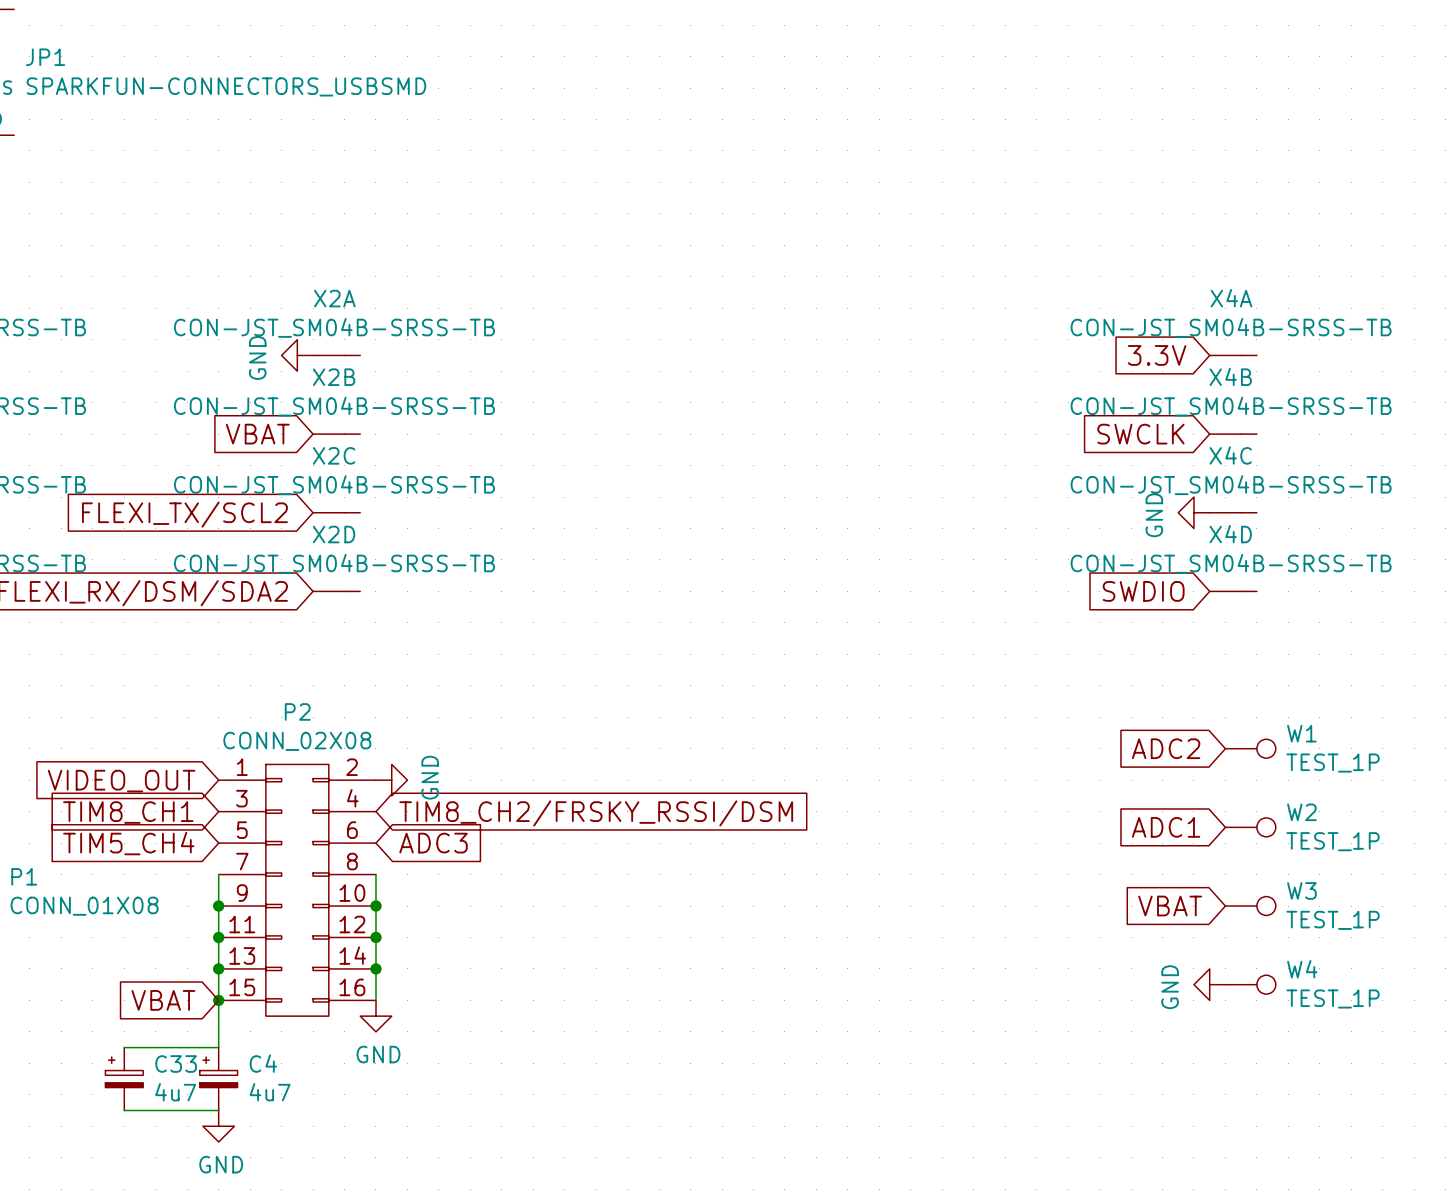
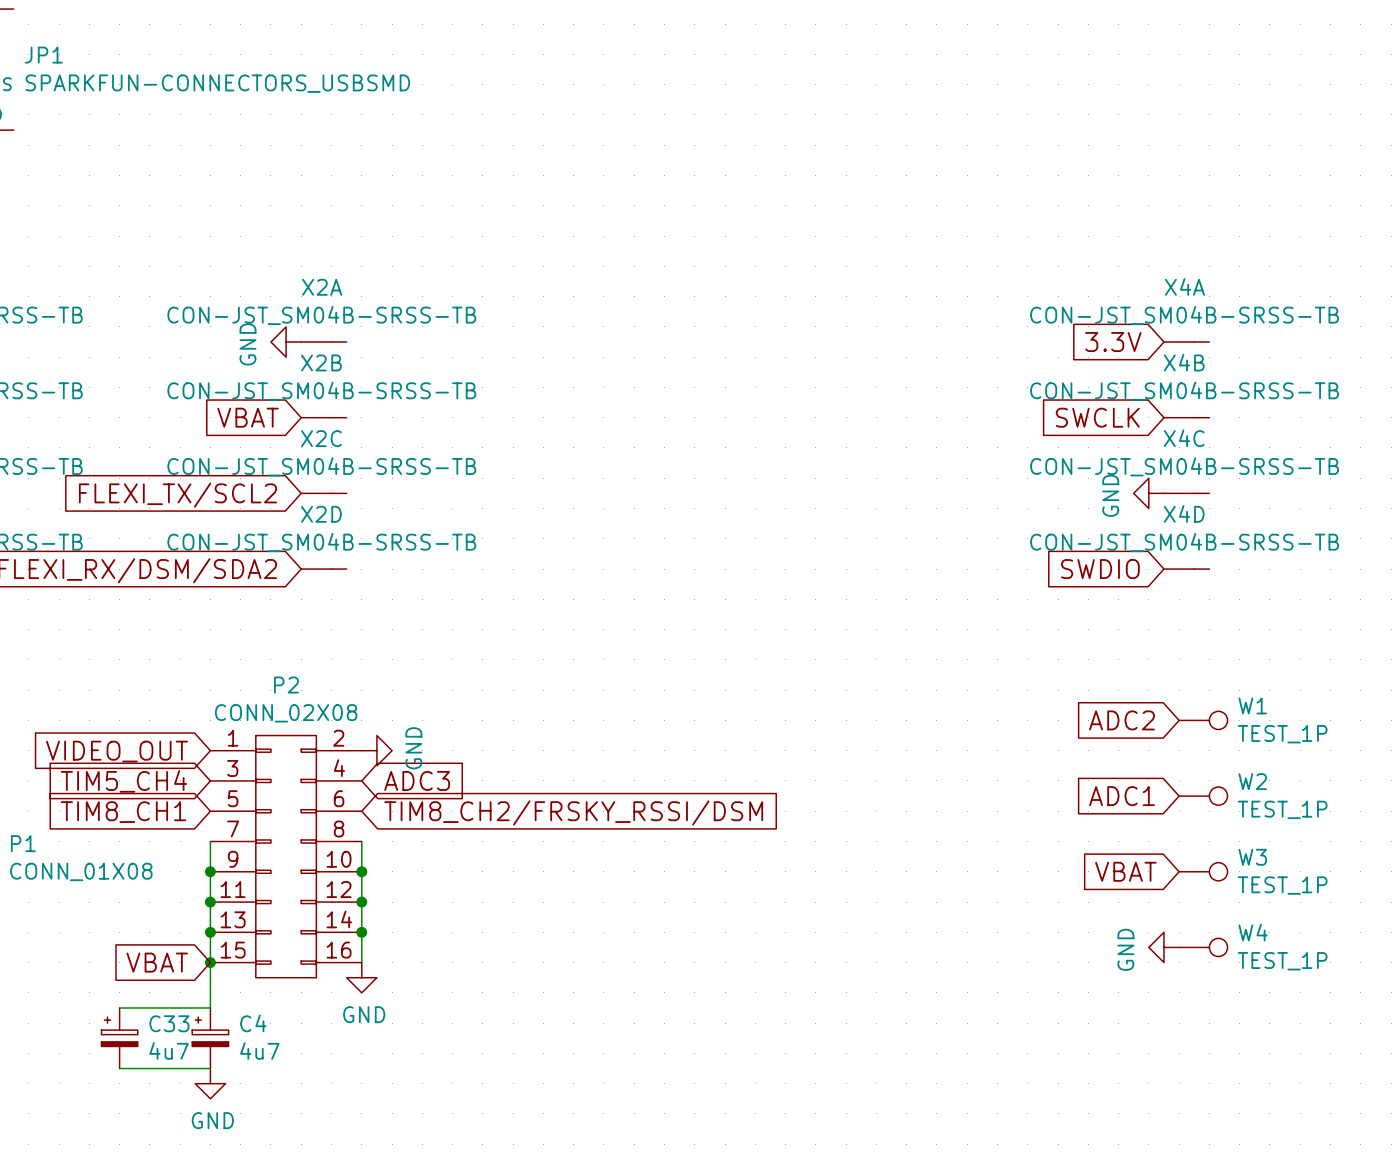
global label: TIM8_CH1 (128, 812) -> TIM5_CH4 (123, 781)
global label: TIM8_CH2/FRSKY_RSSI/DSM (596, 813) -> ADC3 (417, 780)
global label: TIM5_CH4 (128, 843) -> TIM8_CH1 (123, 812)
global label: ADC3 (433, 843) -> TIM8_CH2/FRSKY_RSSI/DSM (573, 812)

